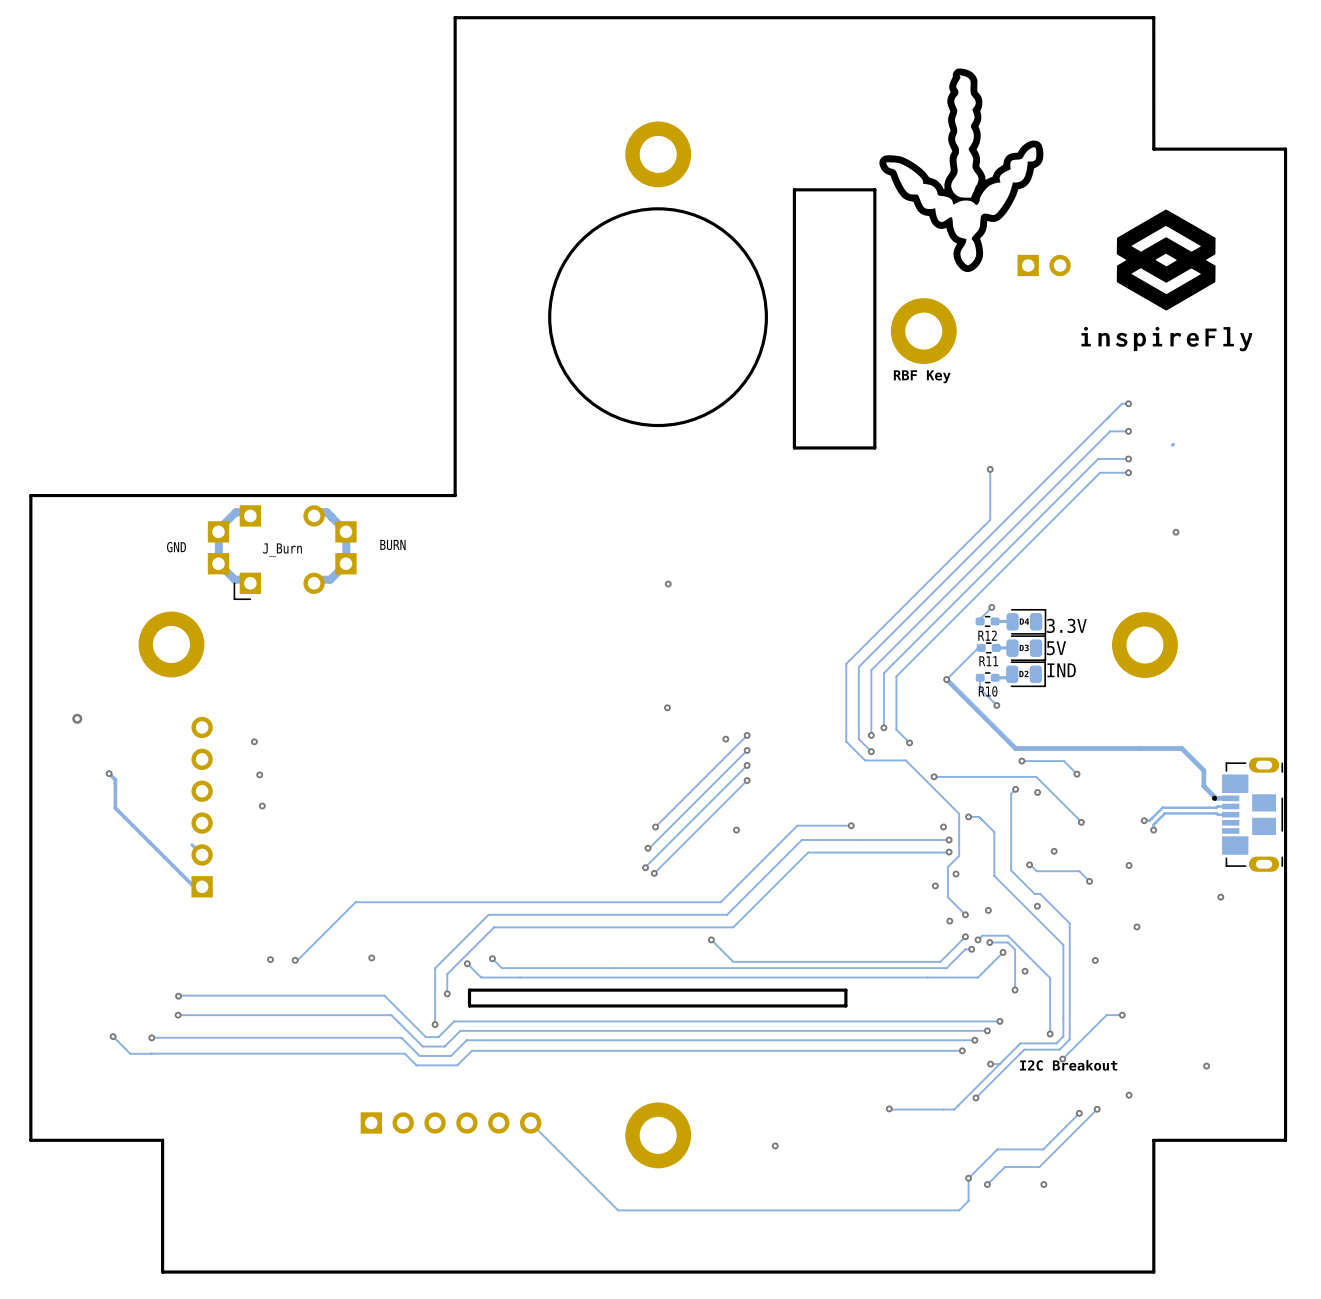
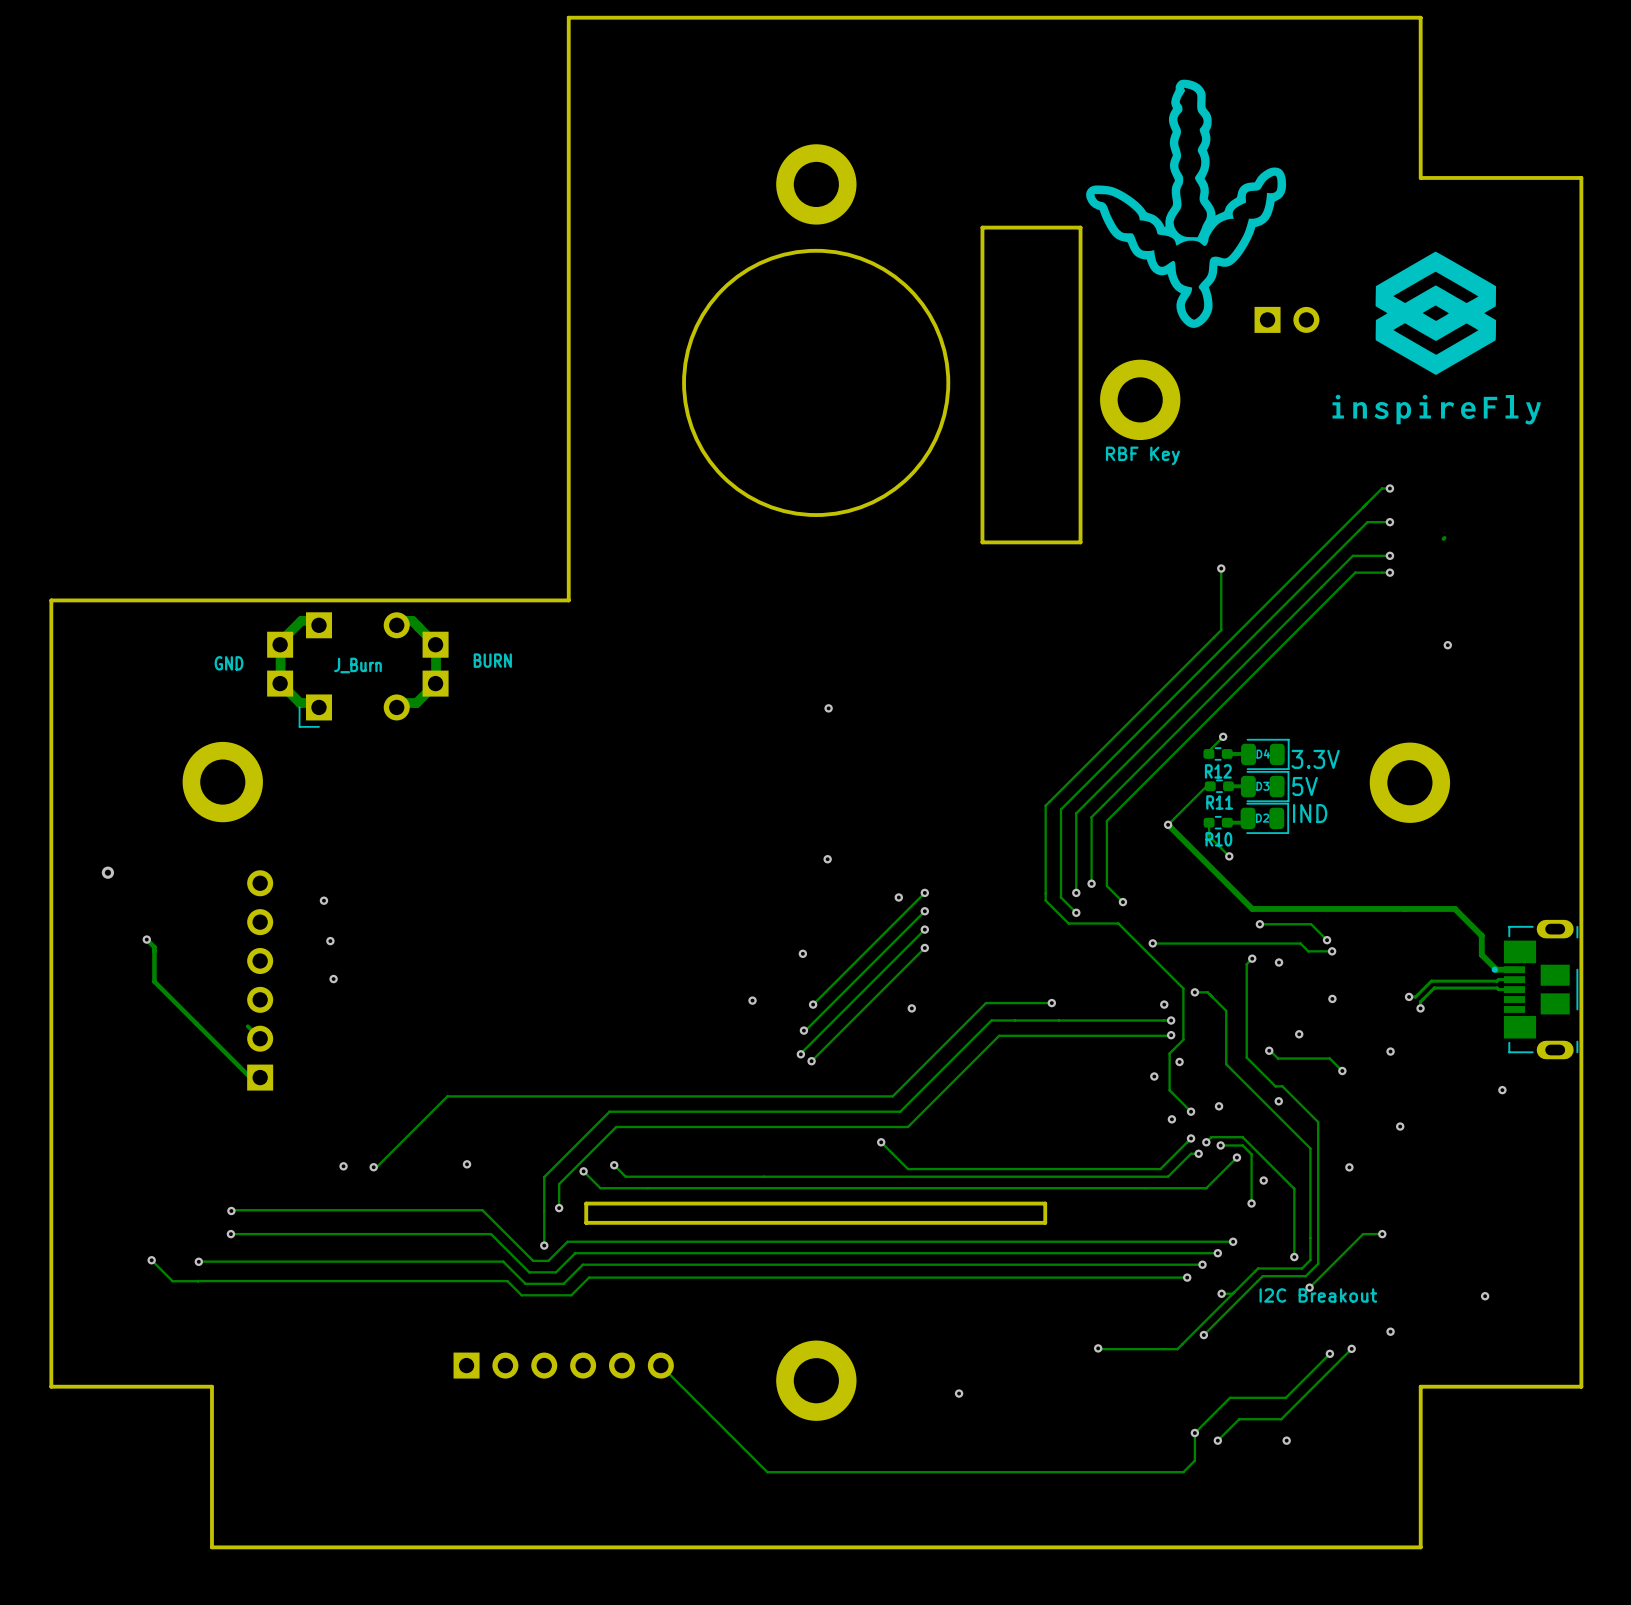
track: (1036, 776) (1081, 822) -> (1277, 943) (1300, 943) (1308, 951) (1332, 951)
via: none -> (1332, 951)
via: none -> (802, 953)
via: none -> (752, 1000)

